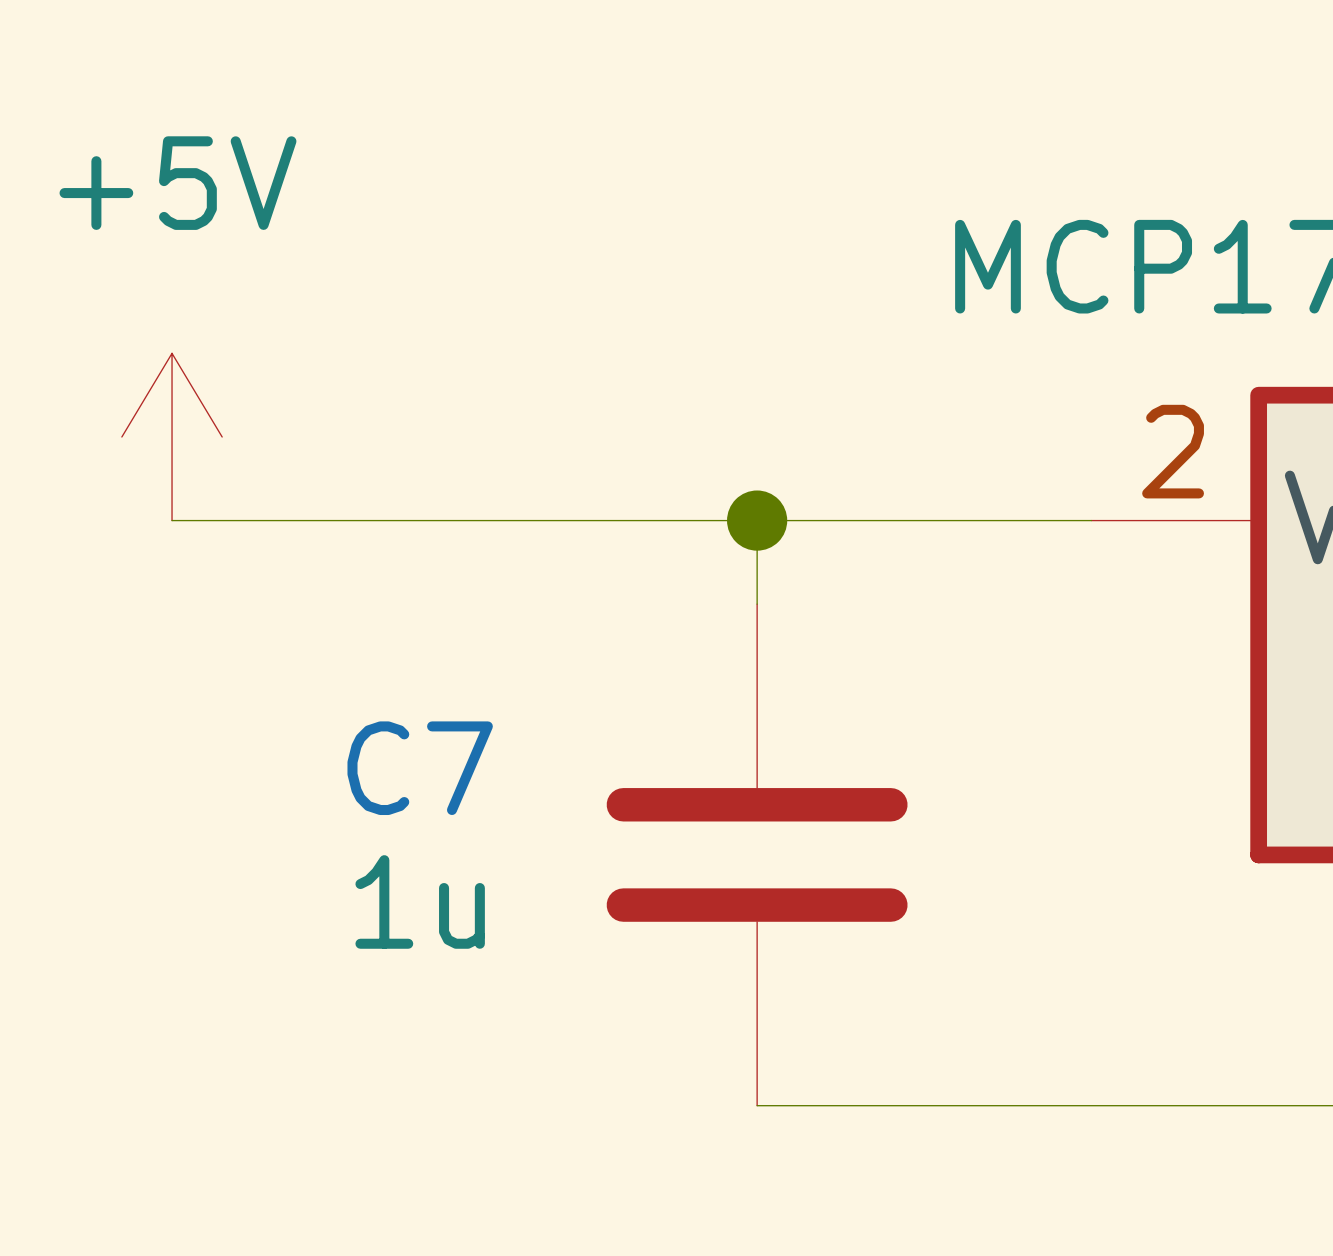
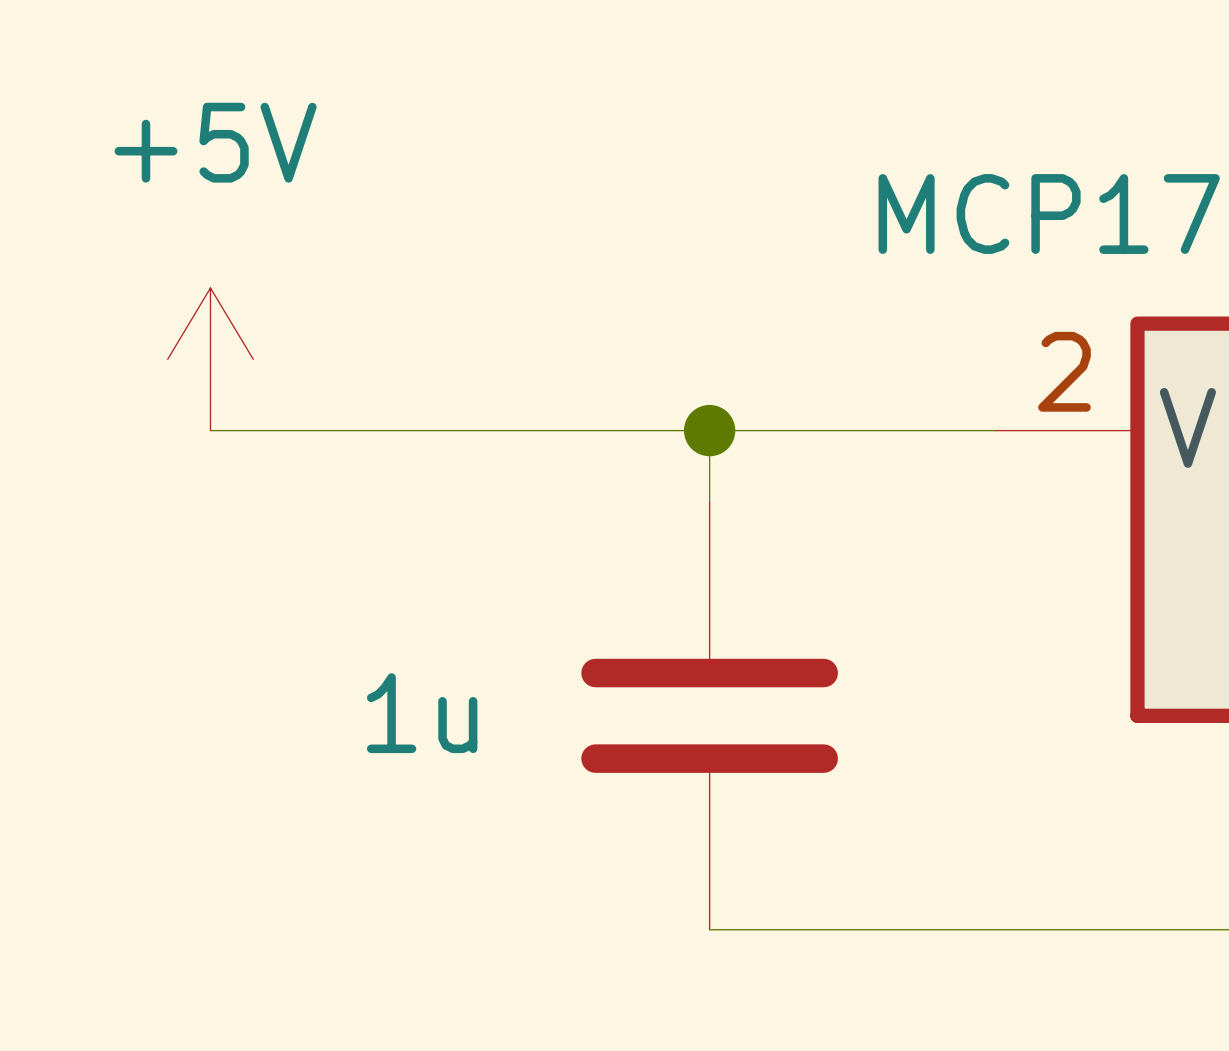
C7 name: C7 (420, 768) -> none
C7 value position: 1u (420, 901) -> 1u (422, 713)

